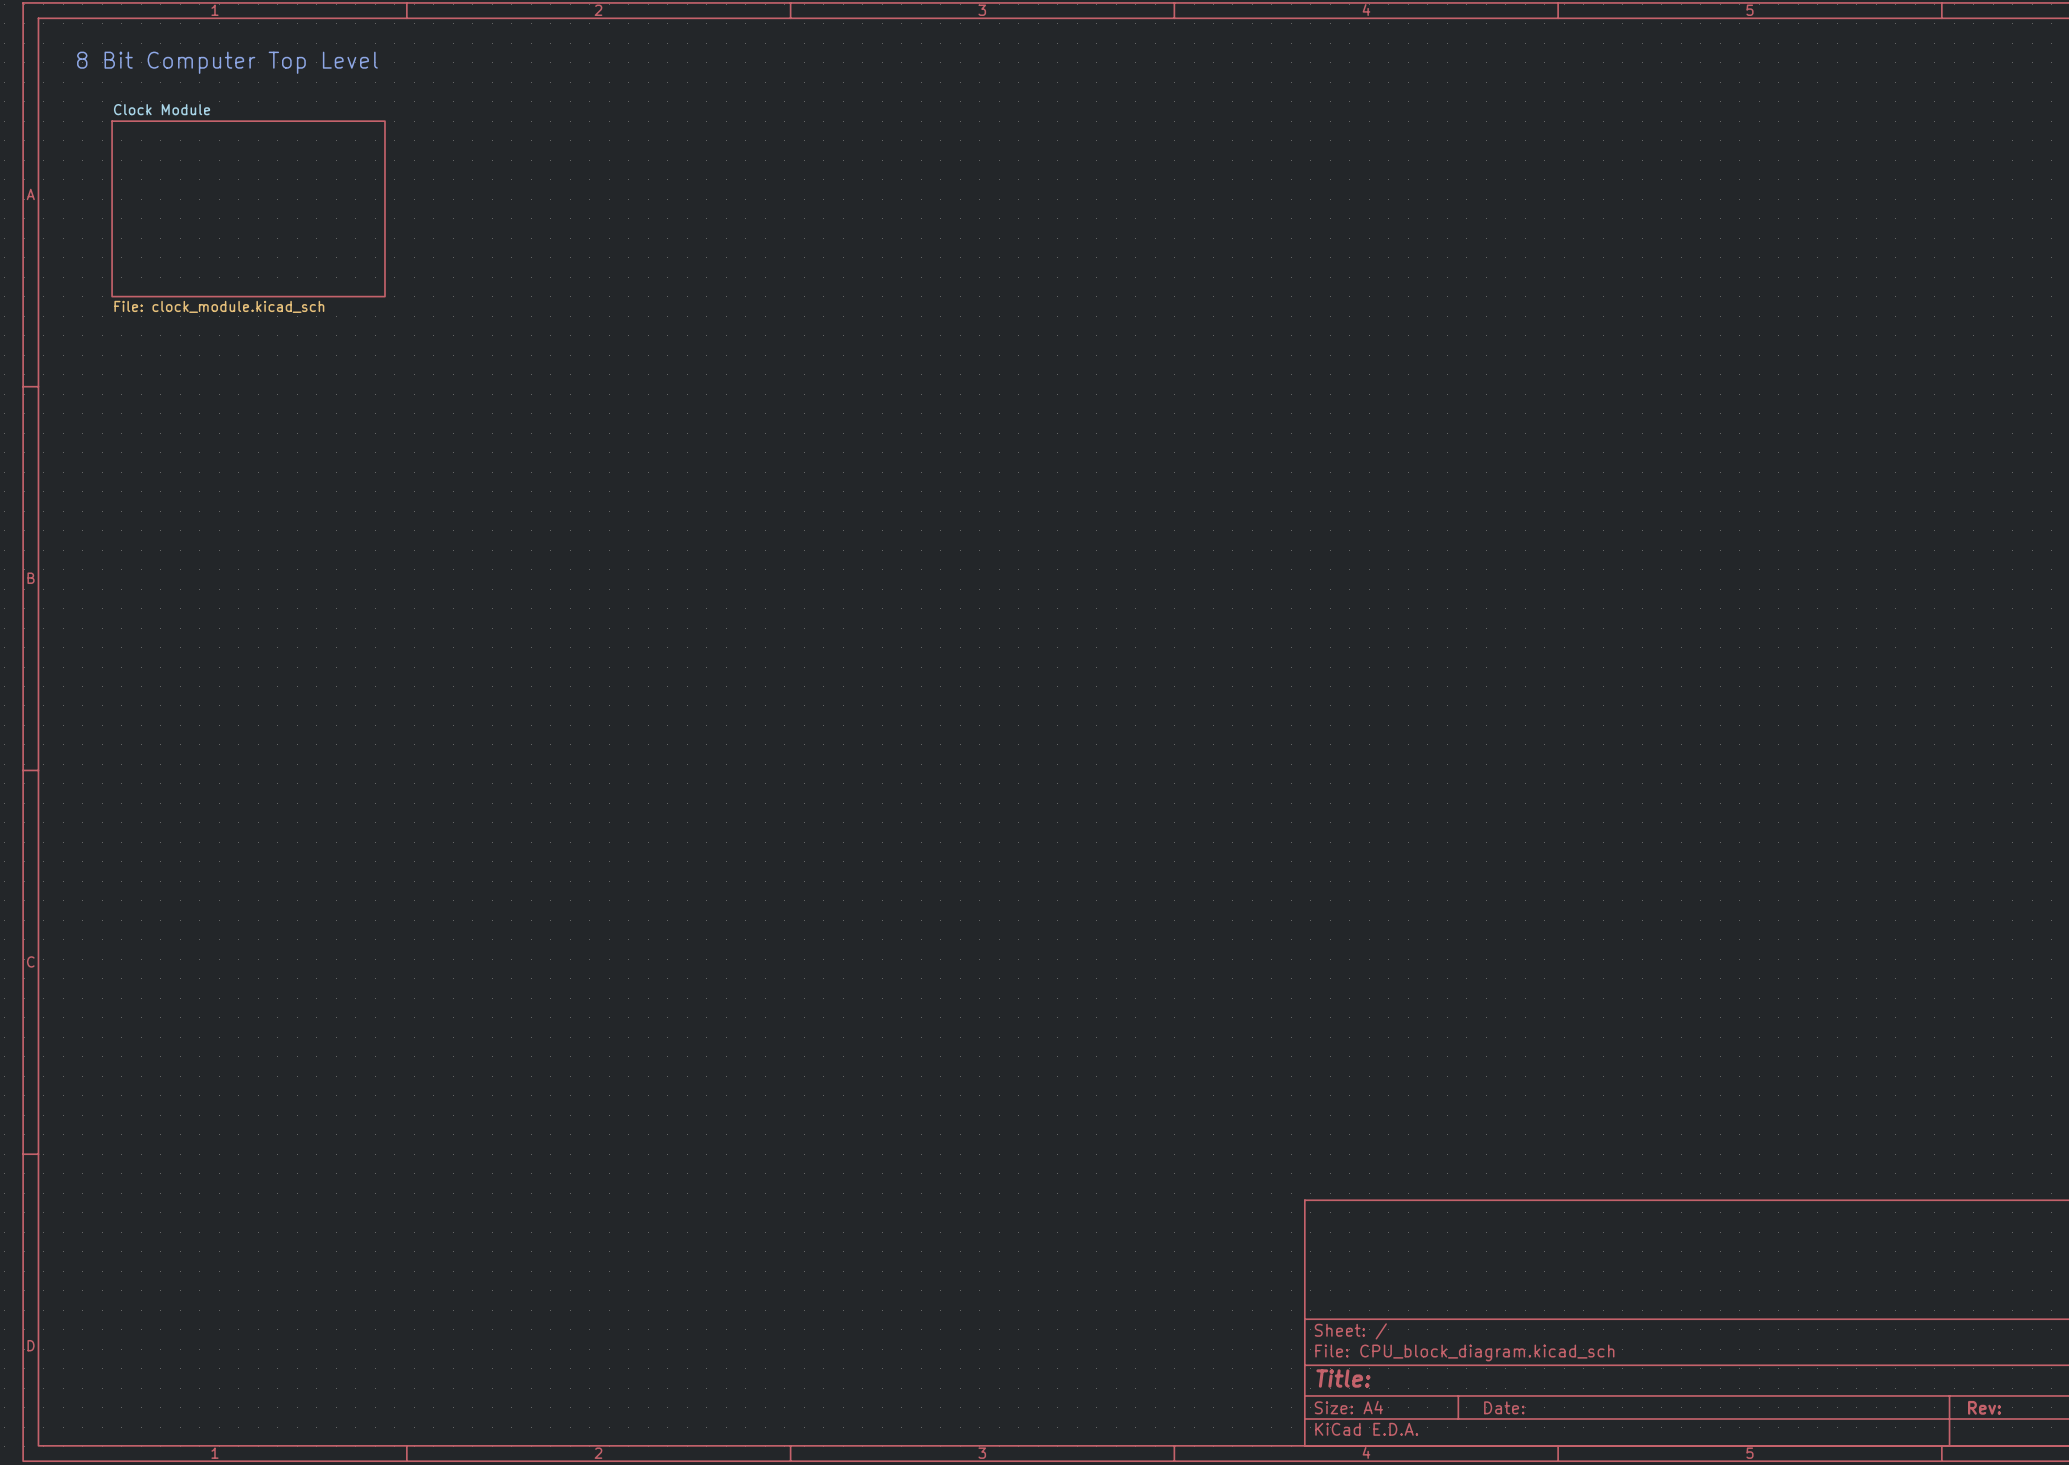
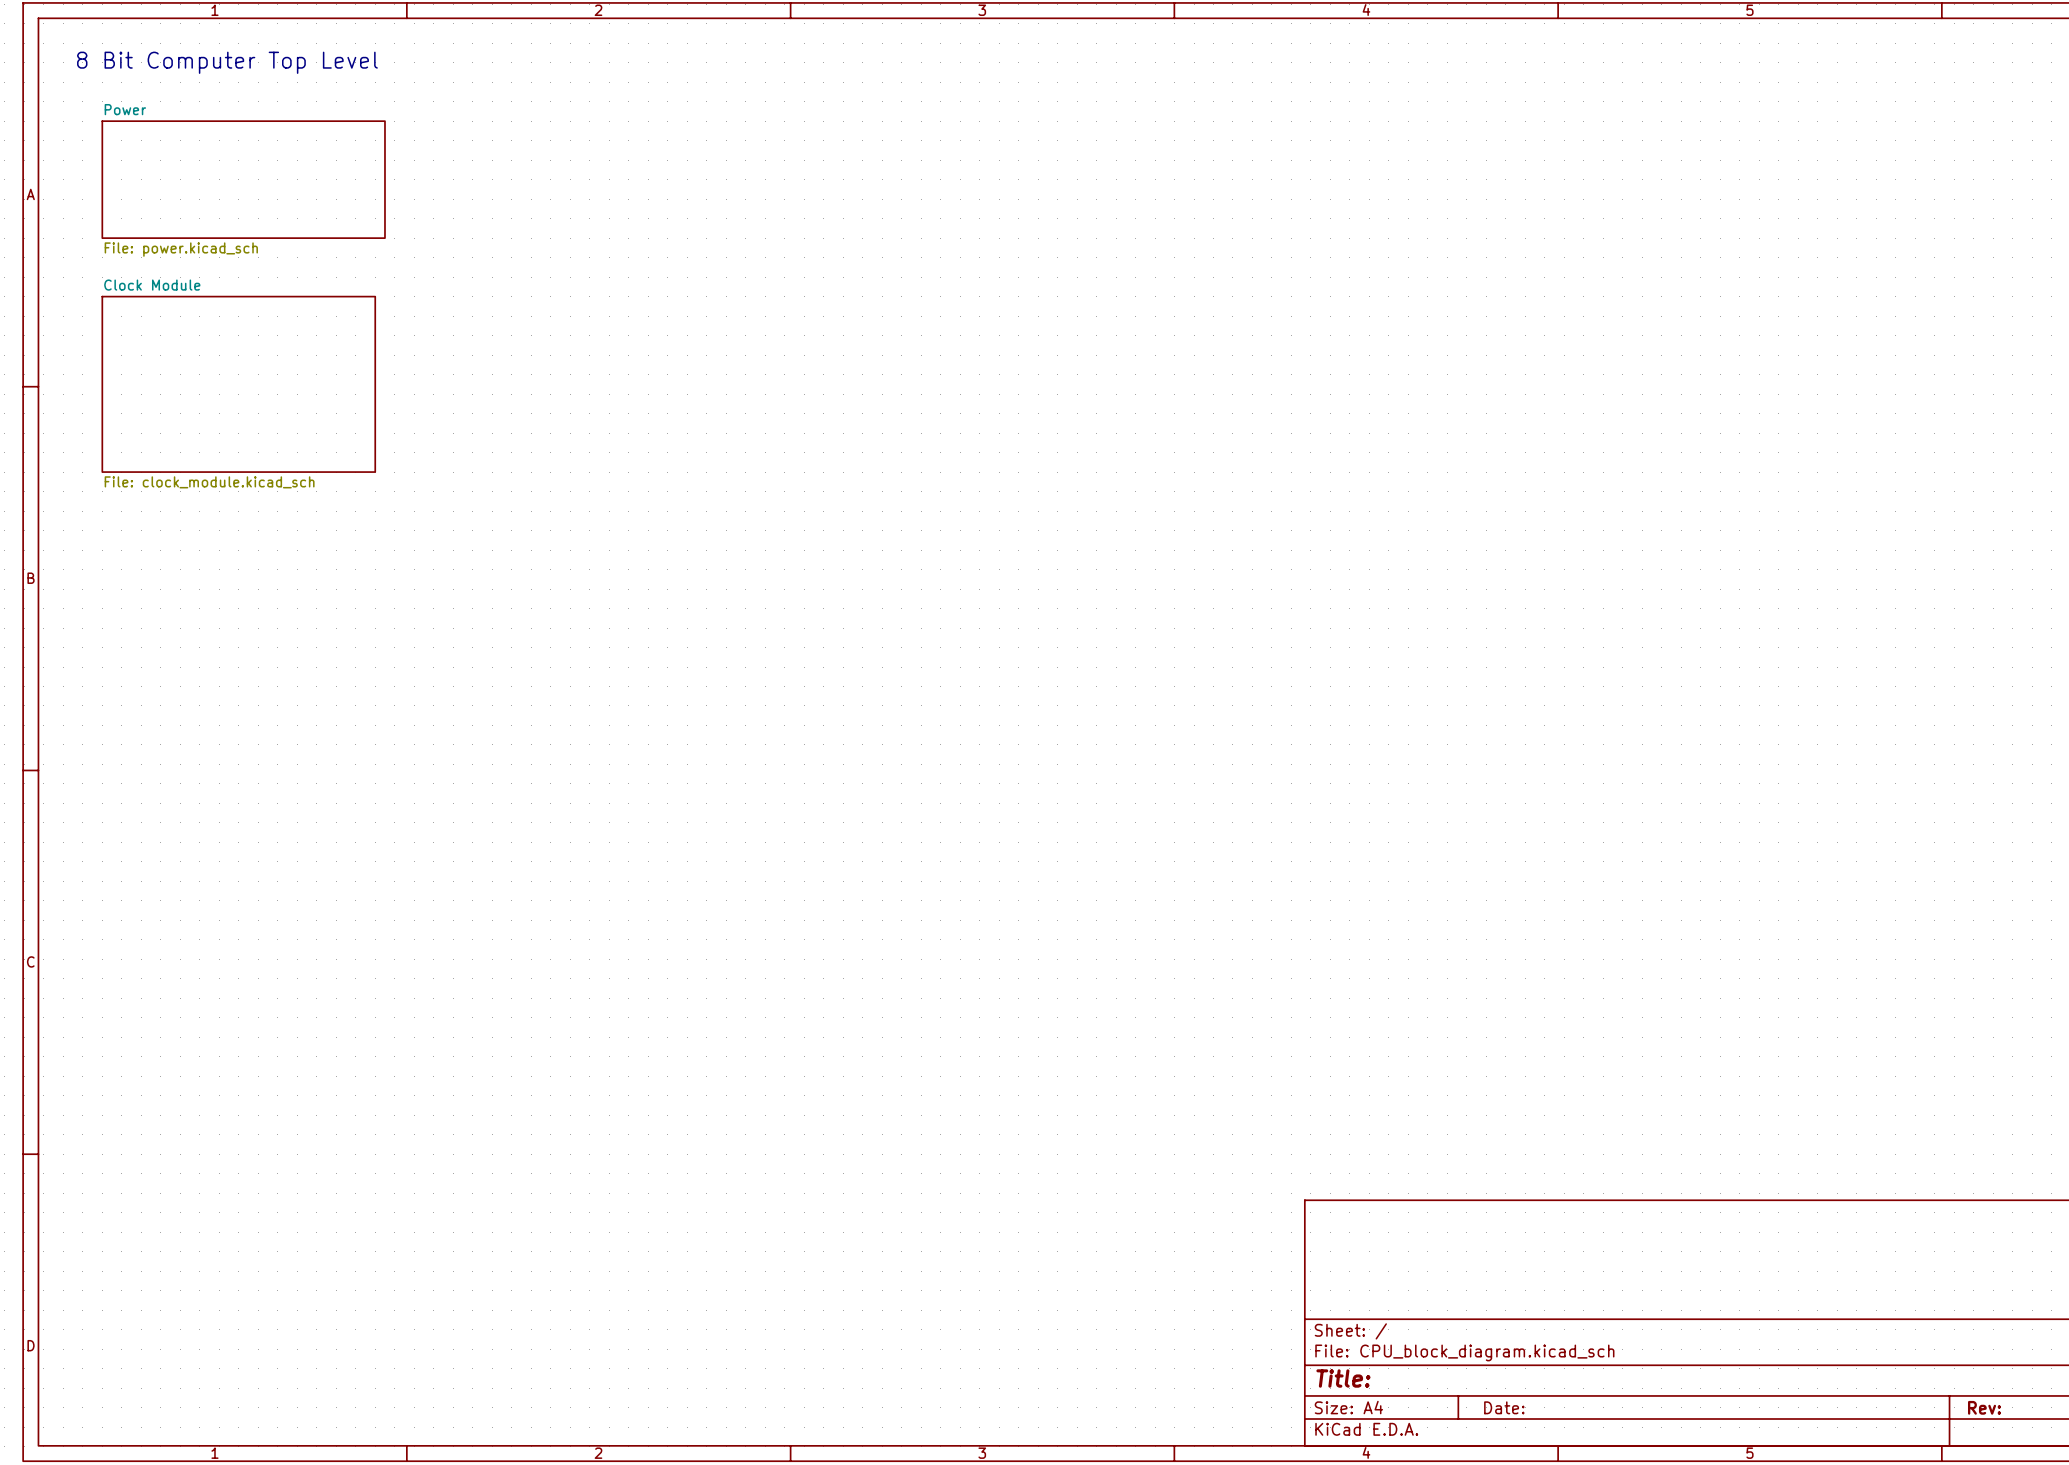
sheet Power: none -> File: power.kicad_sch (243, 179)
sheet Clock Module position: (248, 208) -> (238, 384)

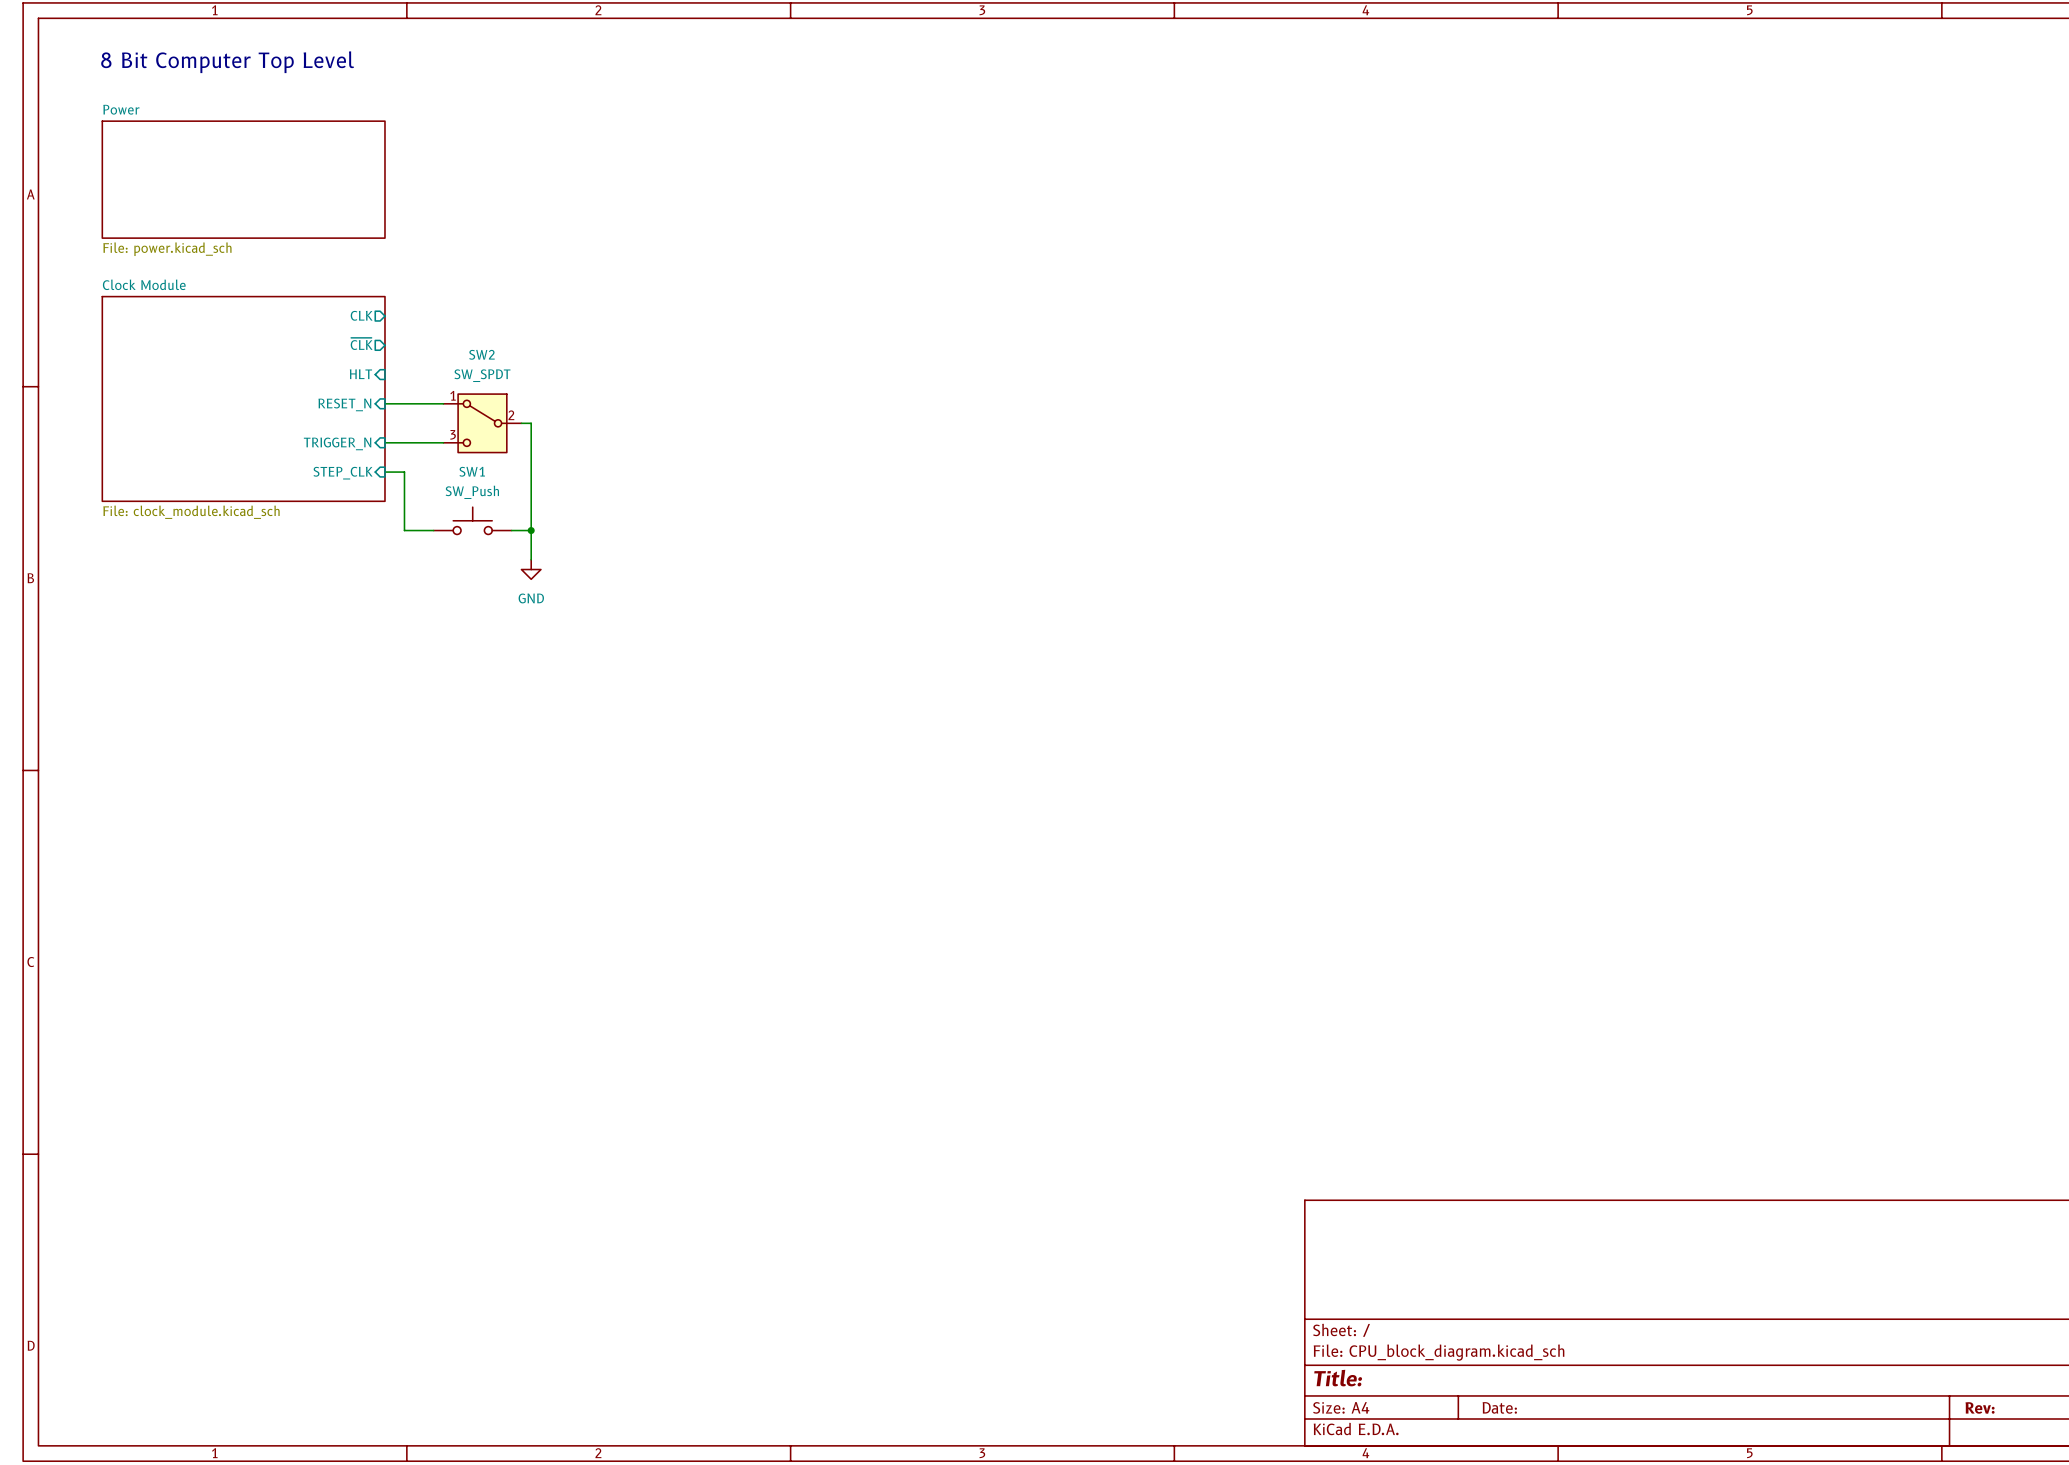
sheet pin: none -> CLK (361, 315)
sheet pin: none -> ~{CLK} (361, 343)
sheet pin: none -> HLT (360, 374)
sheet Clock Module: File: clock_module.kicad_sch (238, 384) -> none
sheet Clock Module: none -> File: clock_module.kicad_sch (243, 398)
sheet pin: none -> RESET_N (344, 404)
wire: none -> (384, 403) (443, 403)
SW2: none -> SW_SPDT (482, 423)
wire: none -> (521, 423) (531, 423) (531, 559)
sheet pin: none -> TRIGGER_N (337, 443)
wire: none -> (384, 442) (443, 442)
sheet pin: none -> STEP_CLK (343, 473)
wire: none -> (384, 472) (404, 472) (404, 530) (433, 530)
SW1: none -> SW_Push (472, 520)
wire: none -> (511, 530) (531, 530)
junction: none -> (531, 530)
power symbol: none -> GND (531, 569)

